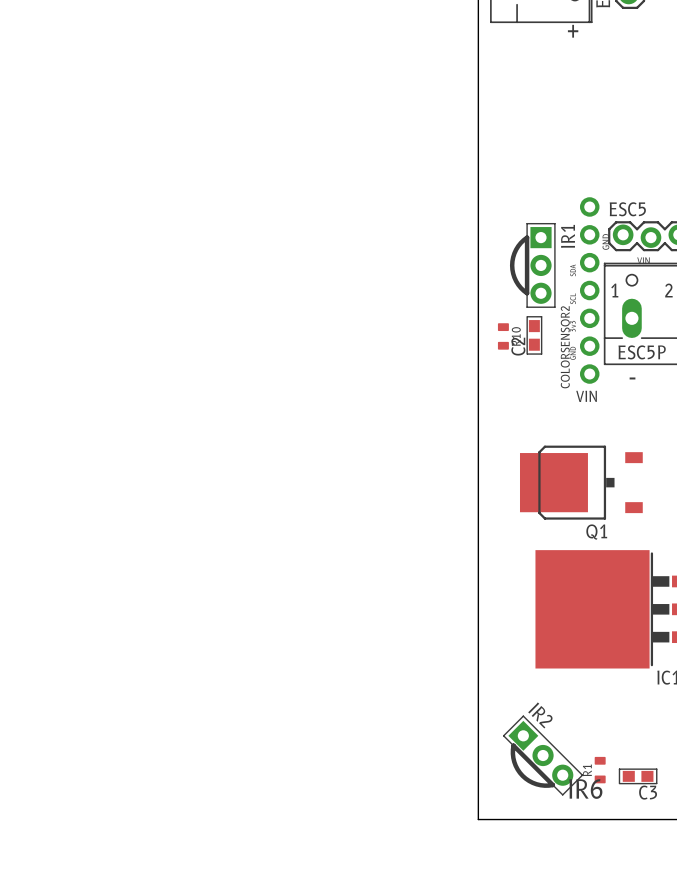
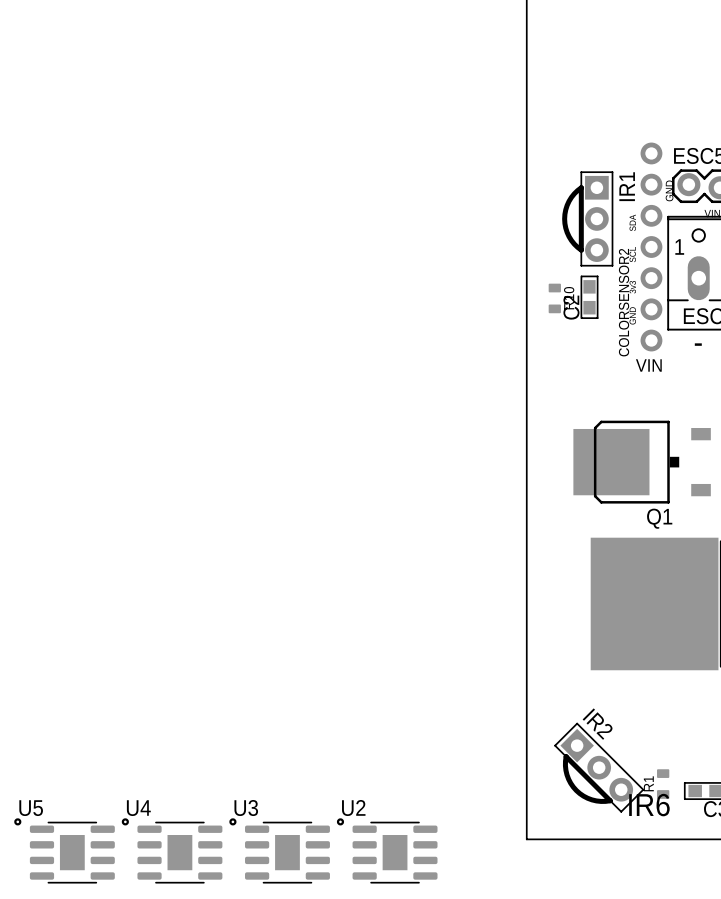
U5: none -> (64, 850)
U4: none -> (172, 850)
U3: none -> (279, 850)
U2: none -> (387, 850)

